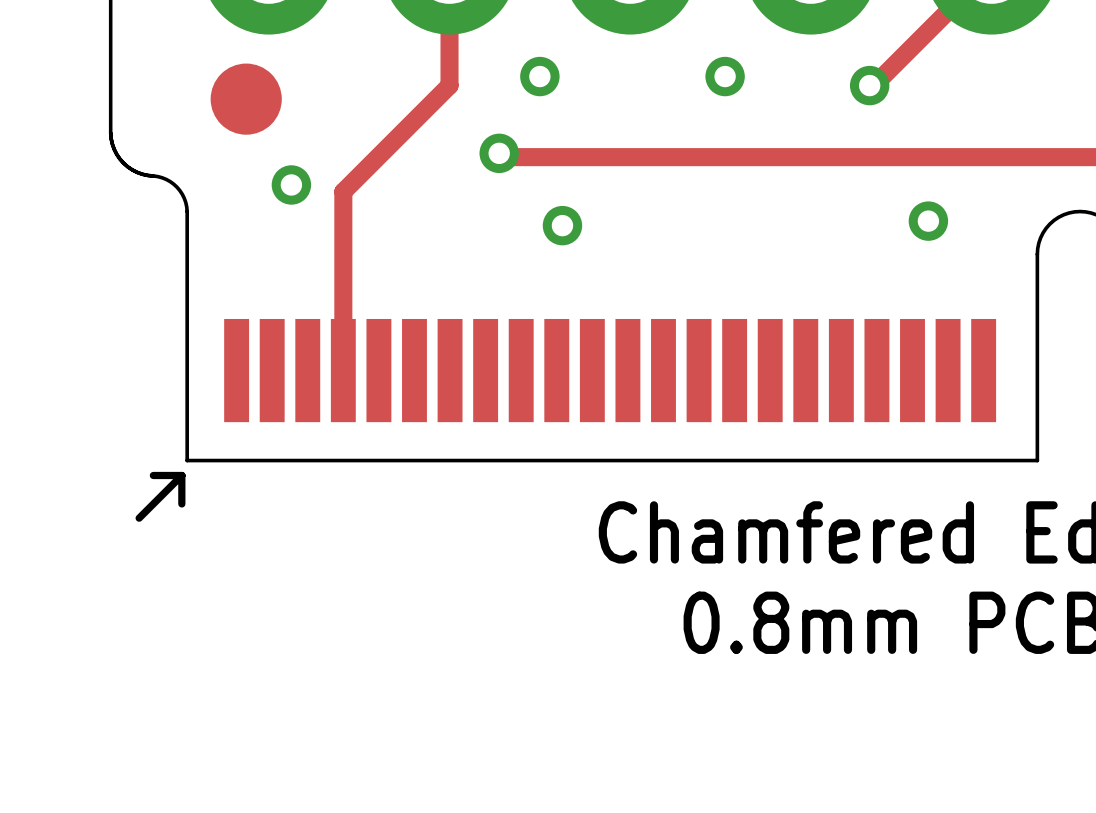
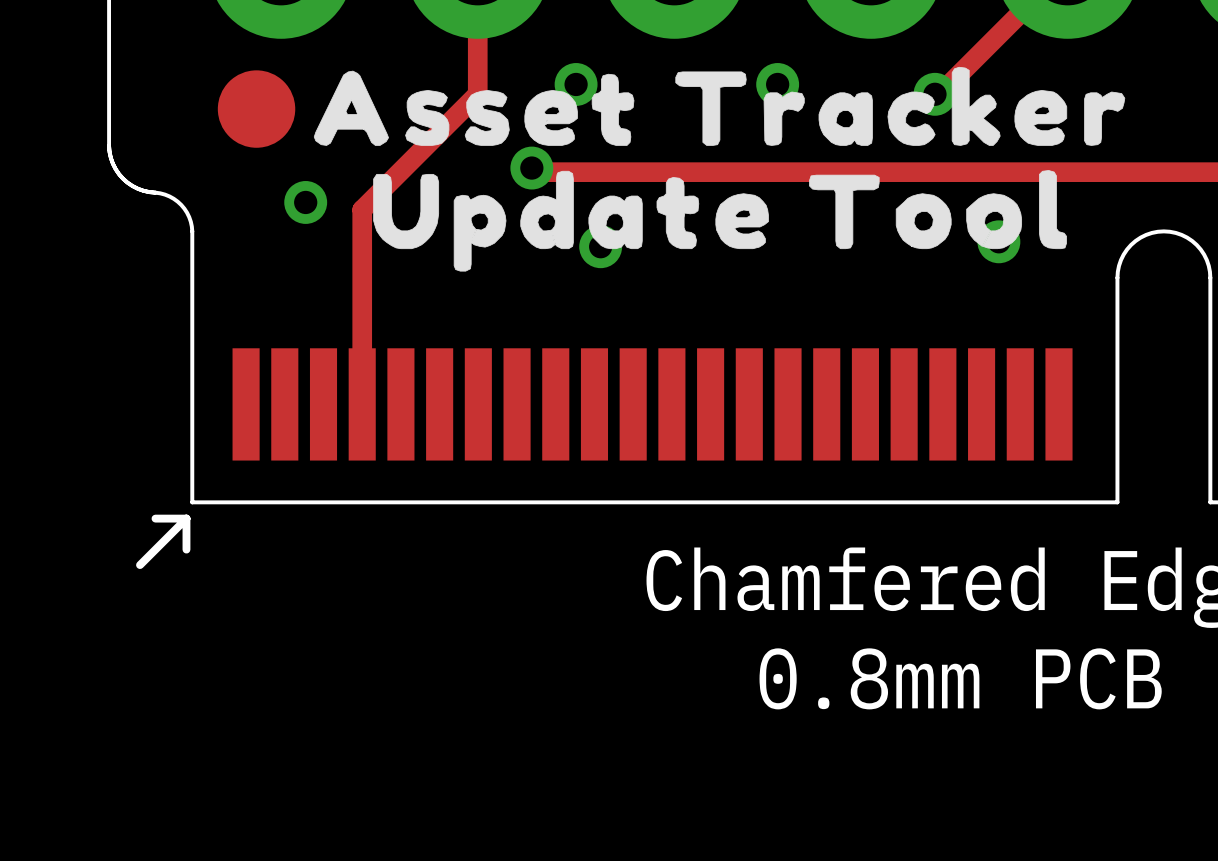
drawing: none -> [313, 66, 1126, 272]

